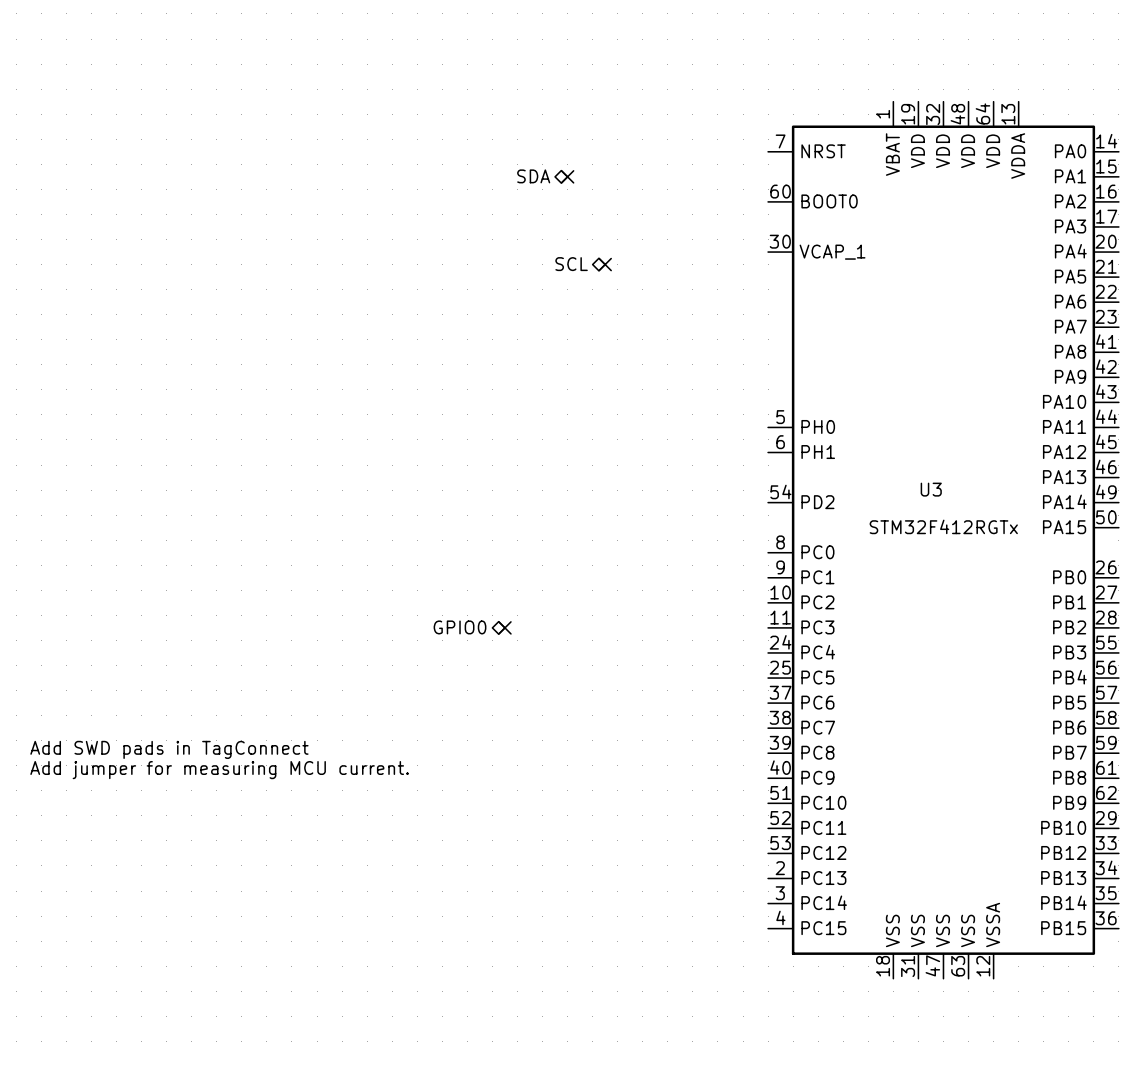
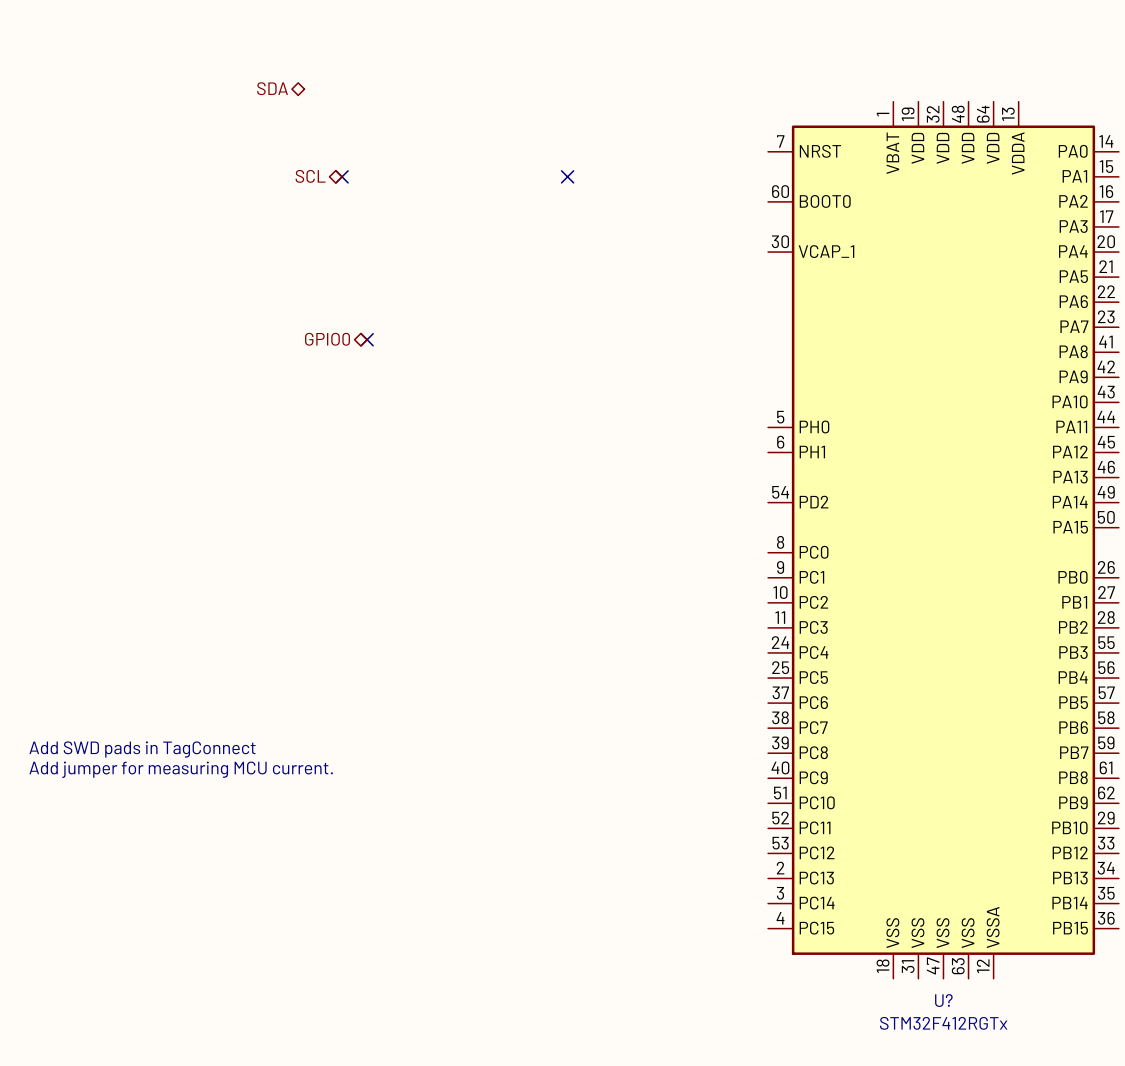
hierarchical label: none -> SDA (272, 88)
hierarchical label: none -> SCL (310, 176)
no-connect mark: none -> (342, 176)
hierarchical label: SDA (533, 176) -> none
hierarchical label: SCL (571, 264) -> none
no-connect mark: (605, 264) -> none
hierarchical label: none -> GPIO0 (327, 339)
no-connect mark: none -> (367, 339)
U3 name: U3 (931, 489) -> U? (943, 1000)
U3 value position: STM32F412RGTx (943, 526) -> STM32F412RGTx (943, 1023)
hierarchical label: GPIO0 (460, 627) -> none
no-connect mark: (504, 627) -> none

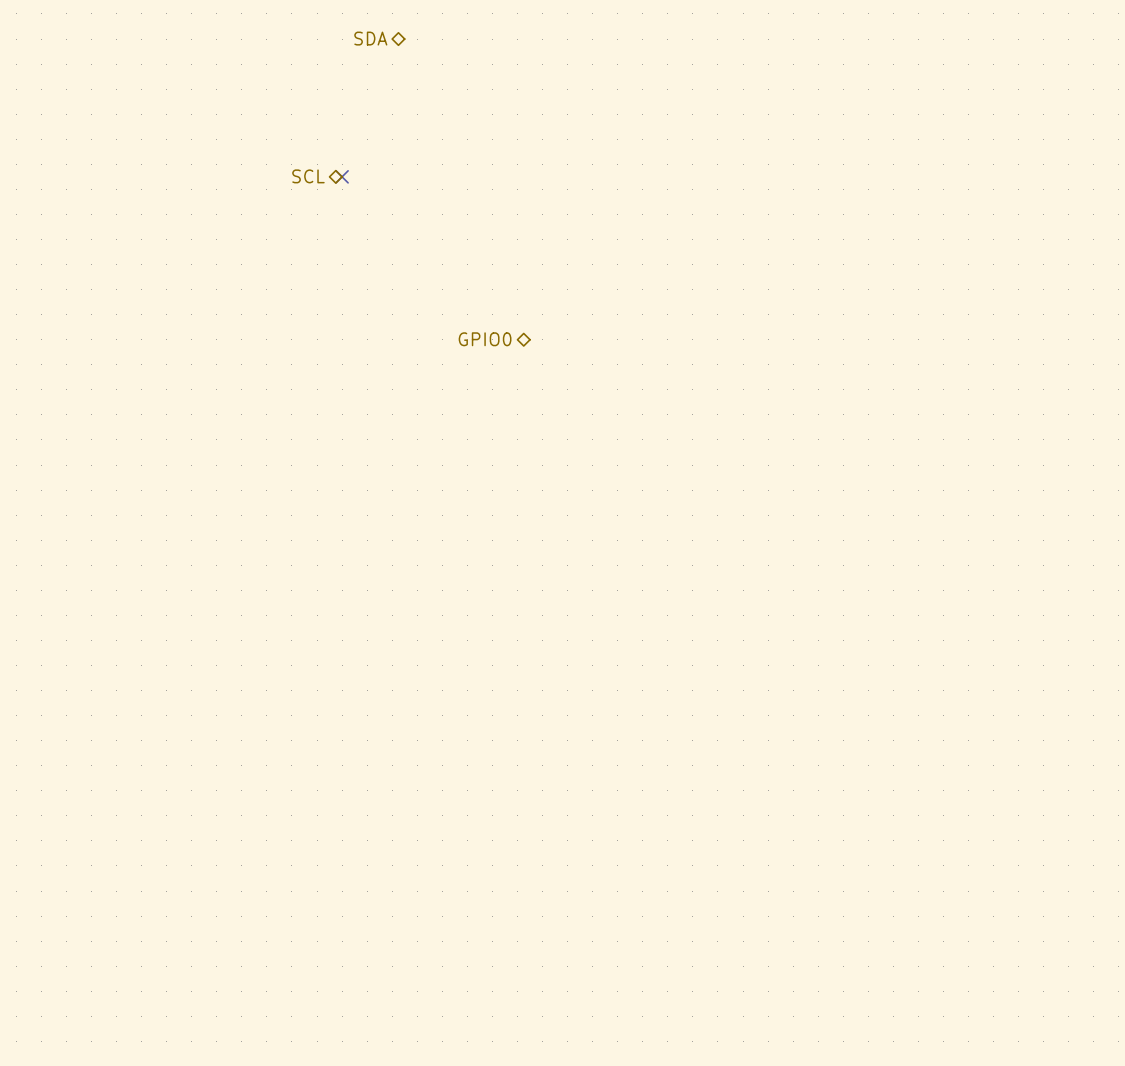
hierarchical label position: SDA (272, 88) -> SDA (370, 38)
no-connect mark: (567, 176) -> none
hierarchical label position: GPIO0 (327, 339) -> GPIO0 (485, 339)
no-connect mark: (367, 339) -> none
U?: STM32F412RGTx (943, 540) -> none
text: Add SWD pads in TagConnect (142, 749) -> none
text: Add jumper for measuring MCU current. (181, 769) -> none

